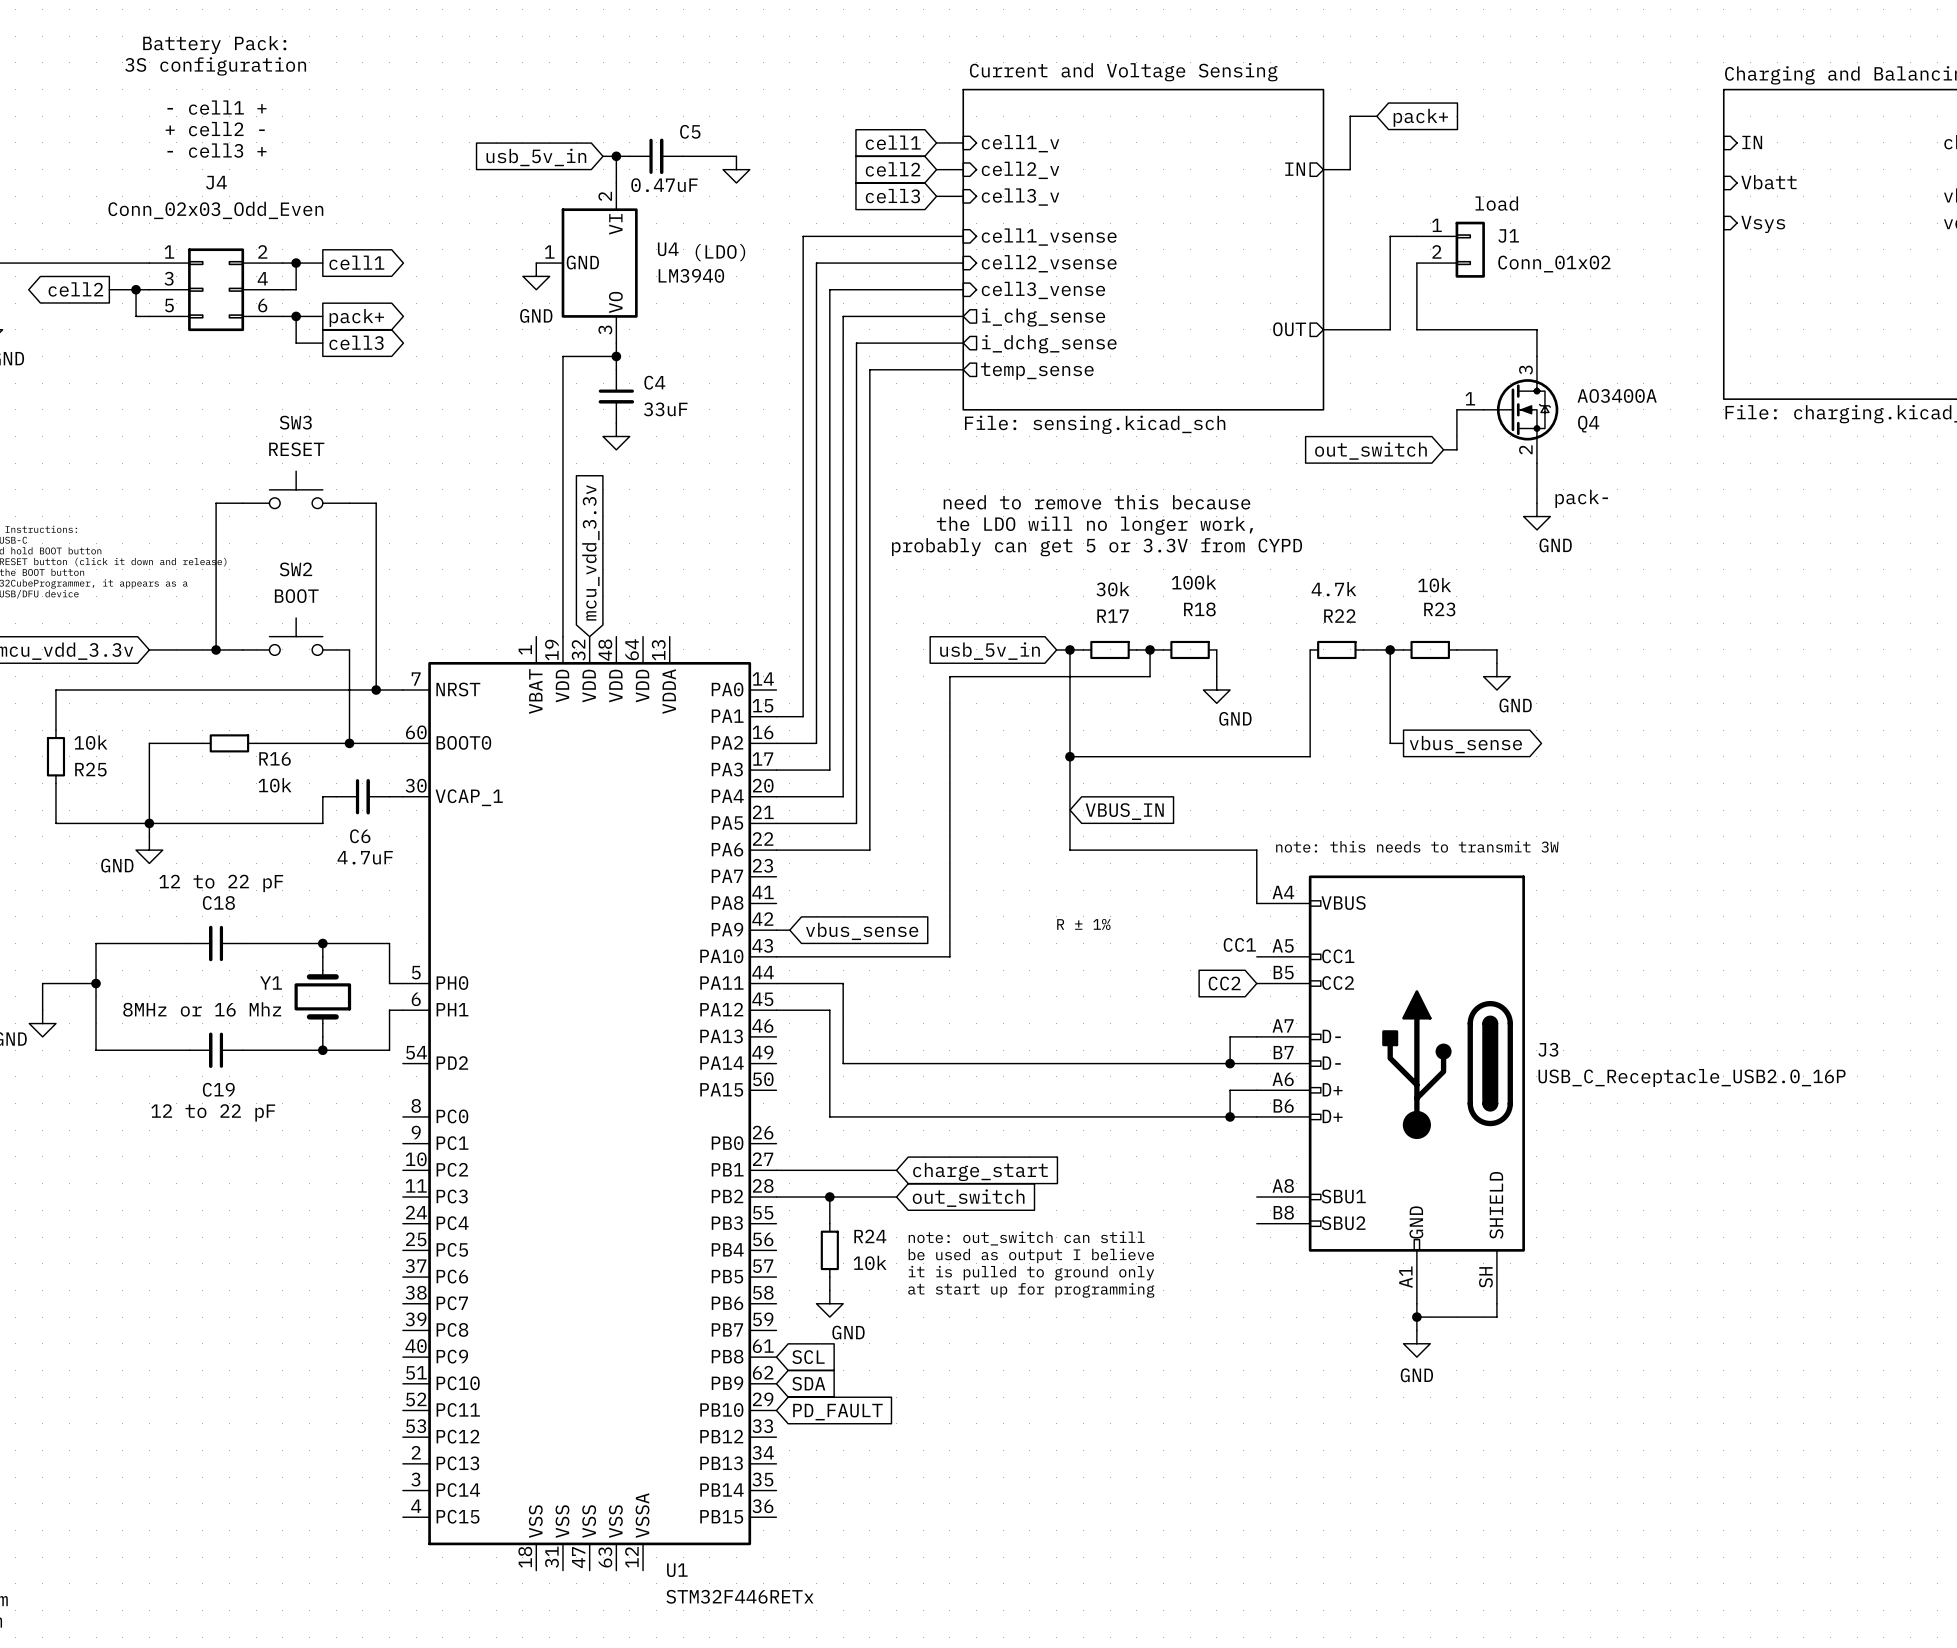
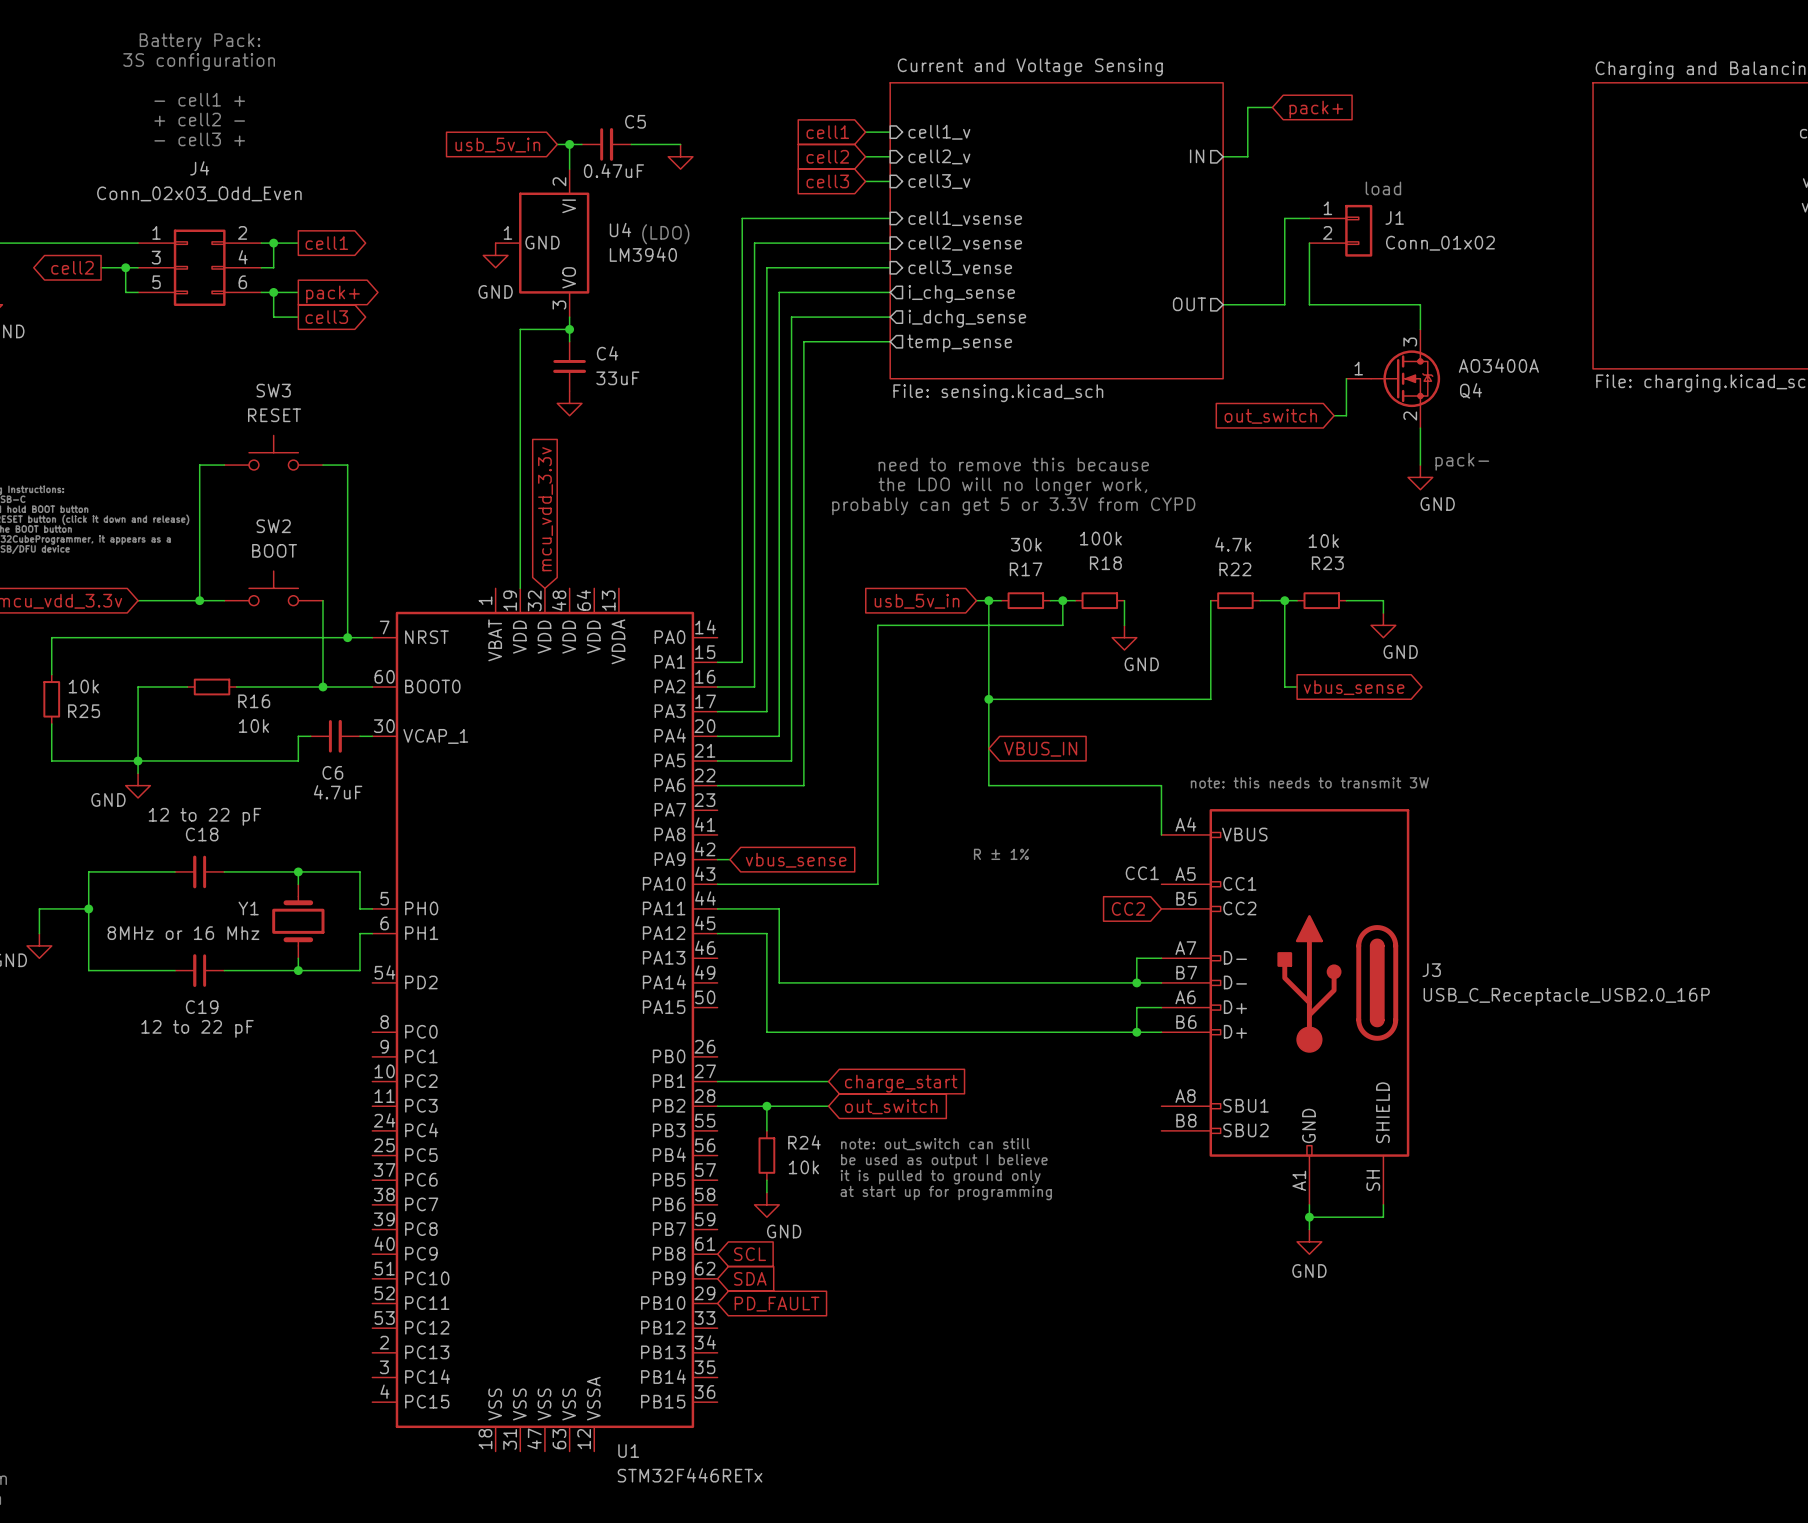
sheet pin: IN (1752, 142) -> none
sheet pin: Vbatt (1769, 182) -> none
sheet pin: Vsys (1763, 224) -> none

